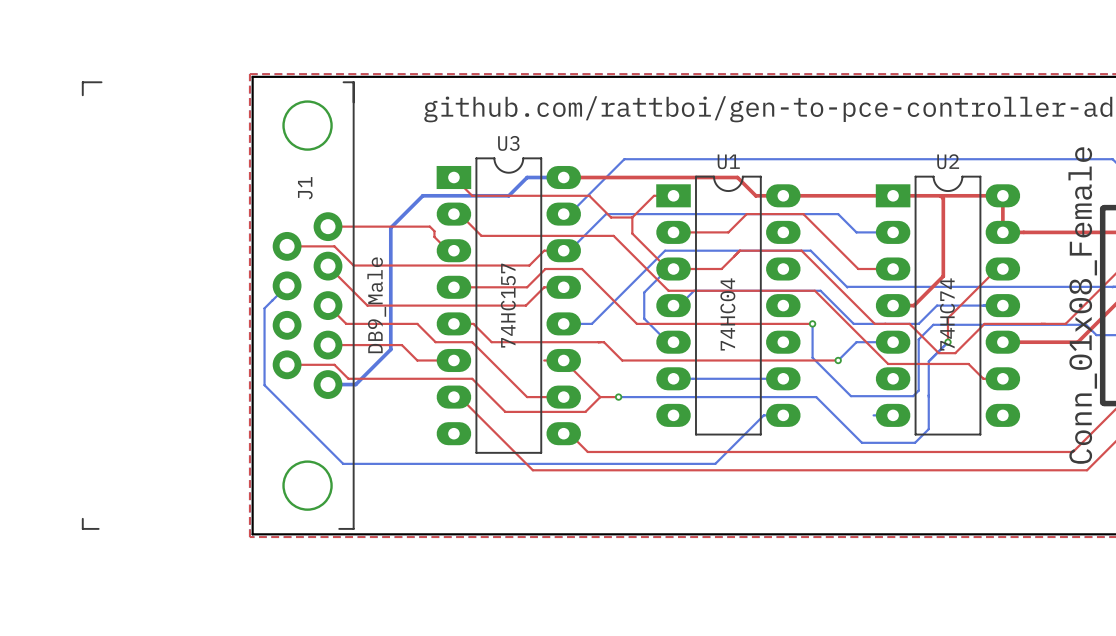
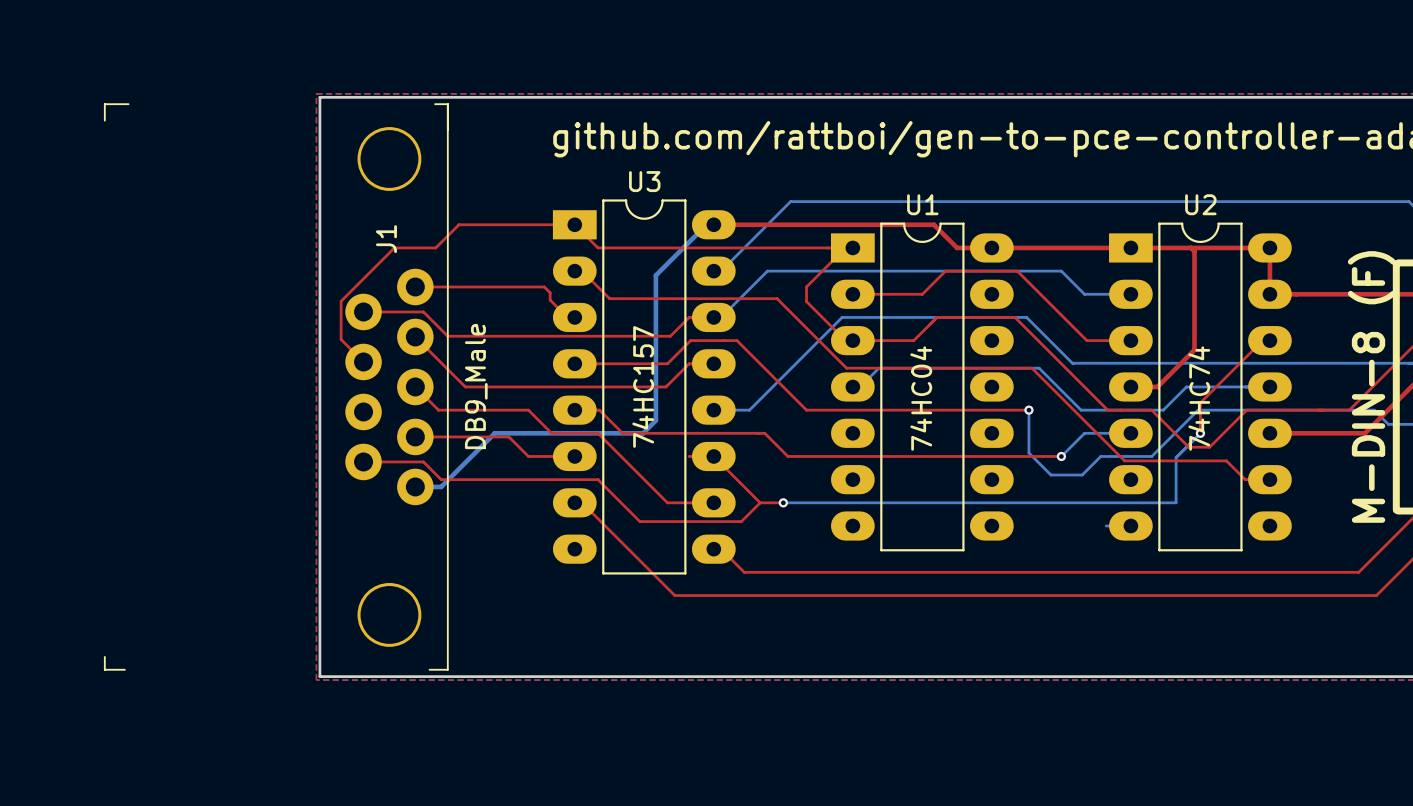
top track: none -> (574, 224) (458, 224) (435, 247) (394, 247) (341, 301) (341, 339) (363, 361)
bottom track: (557, 177) (527, 177) (508, 195) (422, 195) (390, 227) (390, 349) (355, 384) (348, 384) -> (706, 224) (655, 275) (655, 420) (643, 433) (494, 433) (441, 486)
top track: (589, 195) (611, 217) (632, 217) -> (746, 247) (828, 247)
top track: (654, 195) (632, 217) -> none
top track: (632, 217) (632, 233) (636, 238) -> (845, 247) (806, 286) (806, 301)
bottom track: (673, 269) (667, 269) (644, 292) (644, 318) (667, 342) (673, 342) -> none
bottom track: (287, 285) (264, 308) (264, 385) (343, 463) (715, 463) (763, 415) (783, 415) -> none
part value: Conn_01x08_Female (1082, 305) -> M-DIN-8 (F) (1371, 386)
bottom track: (1086, 324) (933, 324) (918, 339) (918, 390) (913, 396) (851, 396) (829, 375) -> (1375, 411) (1198, 410) (1151, 456) (1100, 456) (1082, 475) (1050, 475)
bottom track: (673, 378) (783, 378) -> none
bottom track: (816, 397) (861, 442) (915, 442) (928, 429) (928, 397) -> (1033, 502) (1176, 502)

